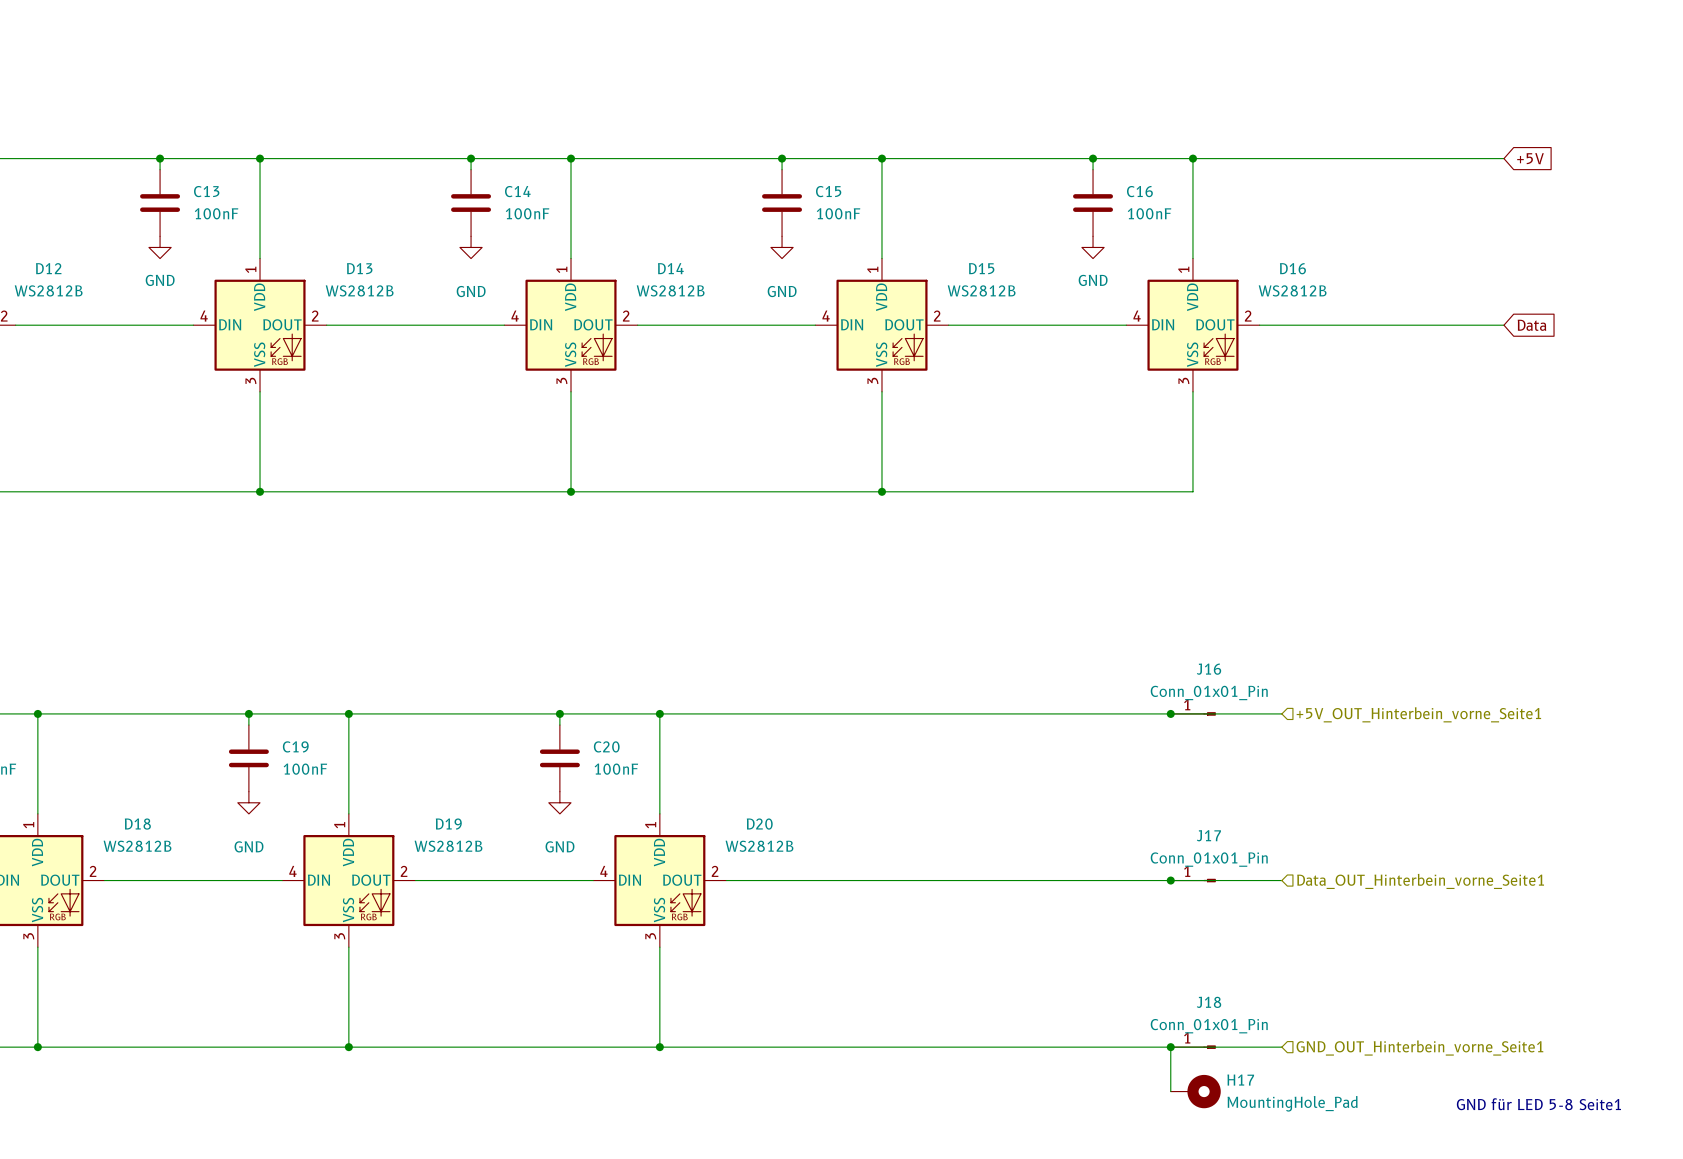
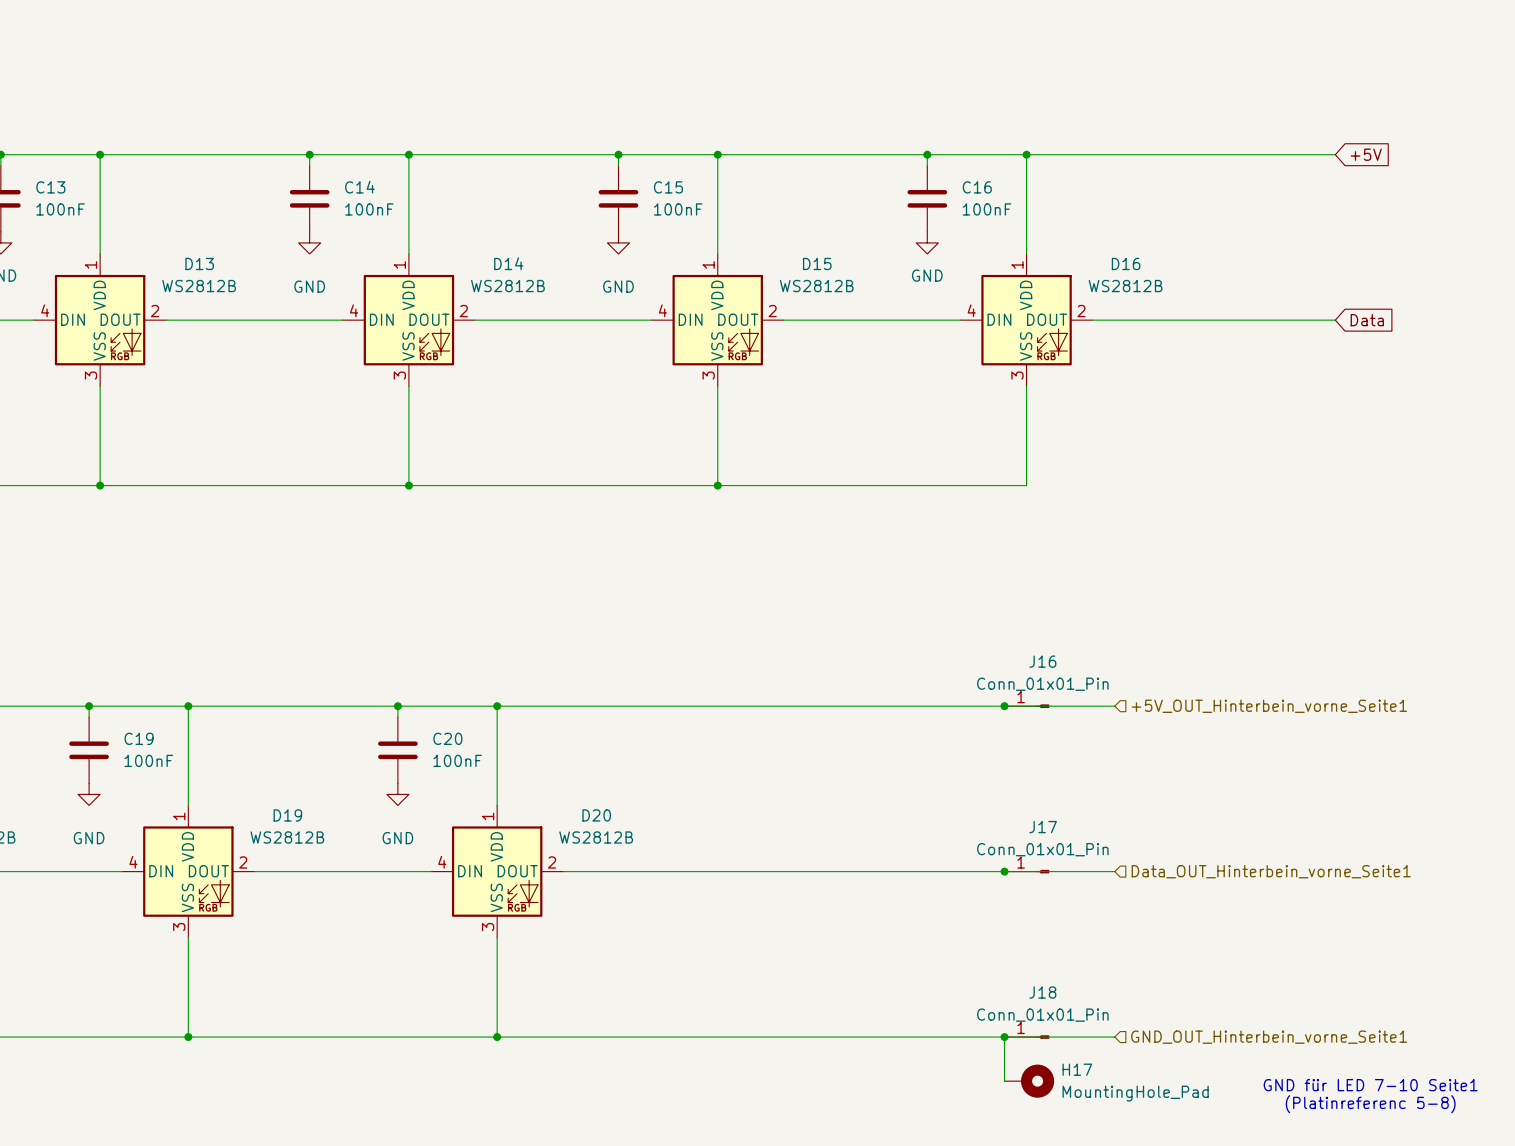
text: GND für LED 5-8 Seite1 (1538, 1104) -> GND für LED 7-10 Seite1 (1370, 1085)
text: none -> (Platinreferenc 5-8) (1370, 1104)

